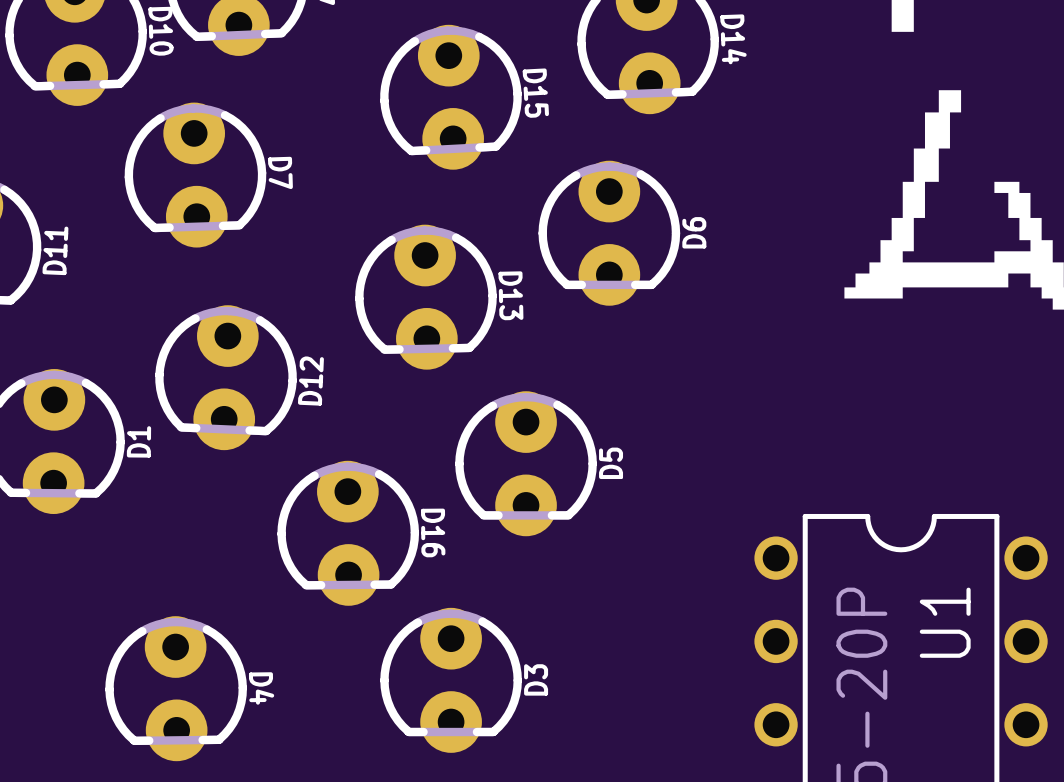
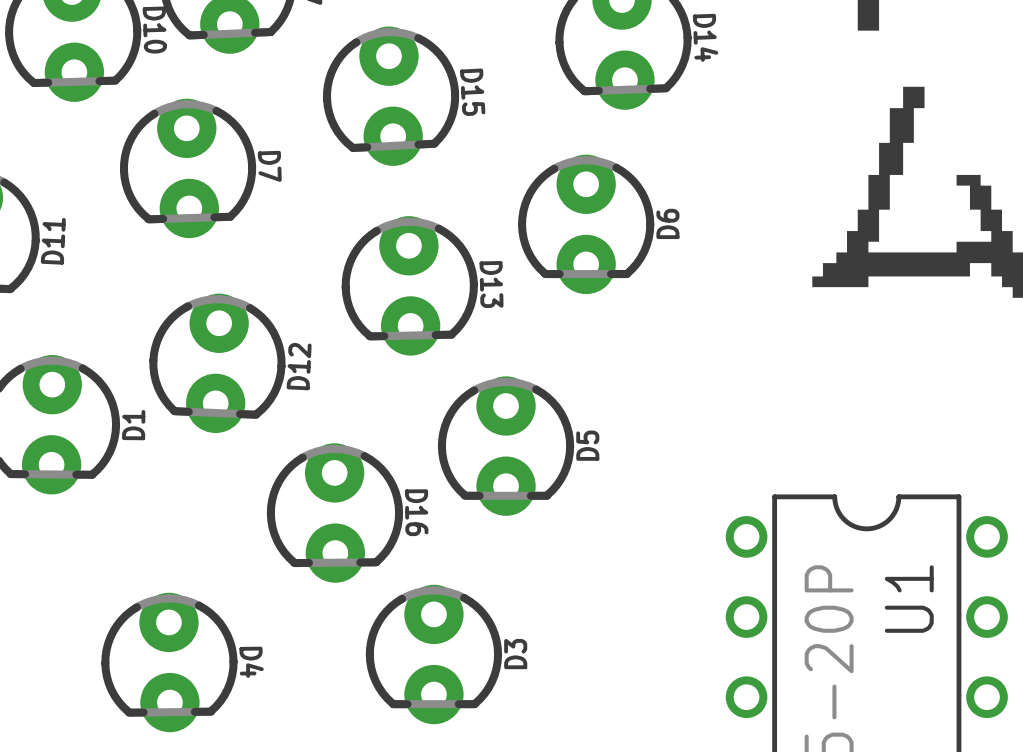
D15 position: (450, 97) -> (391, 96)

